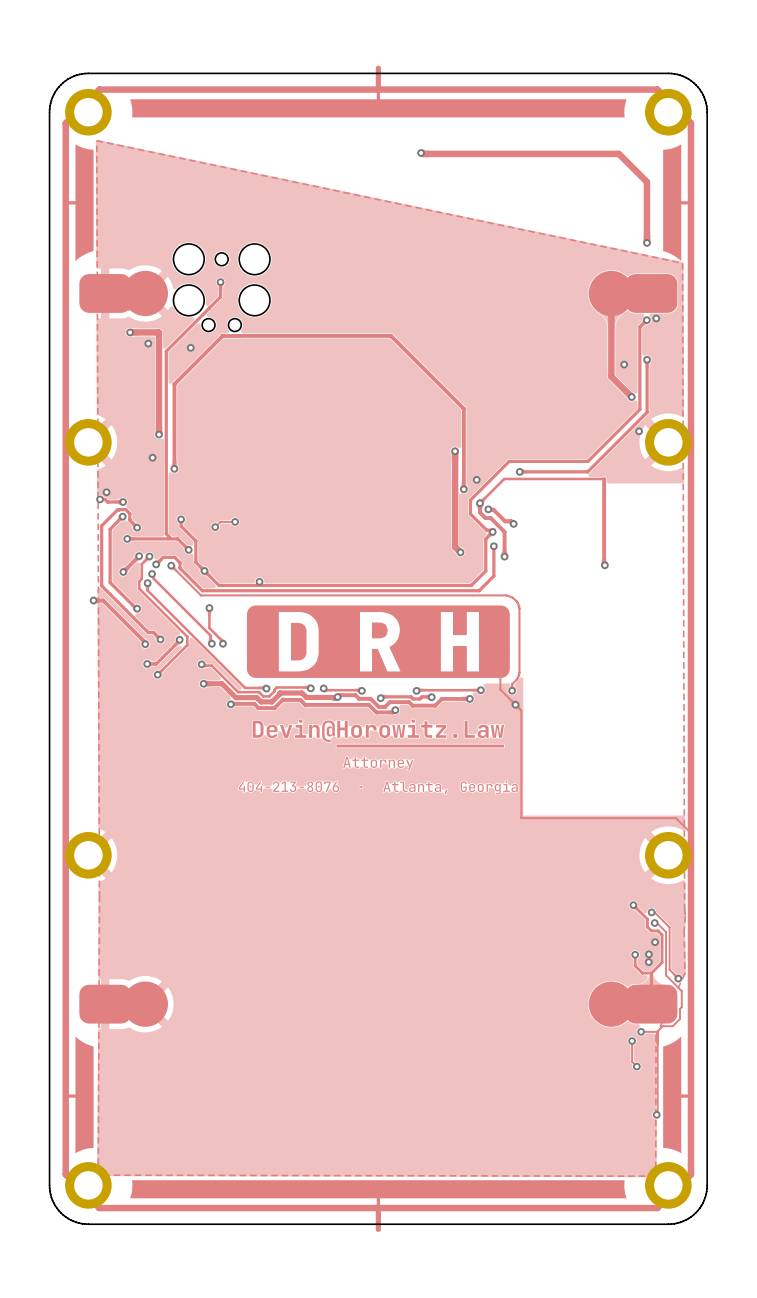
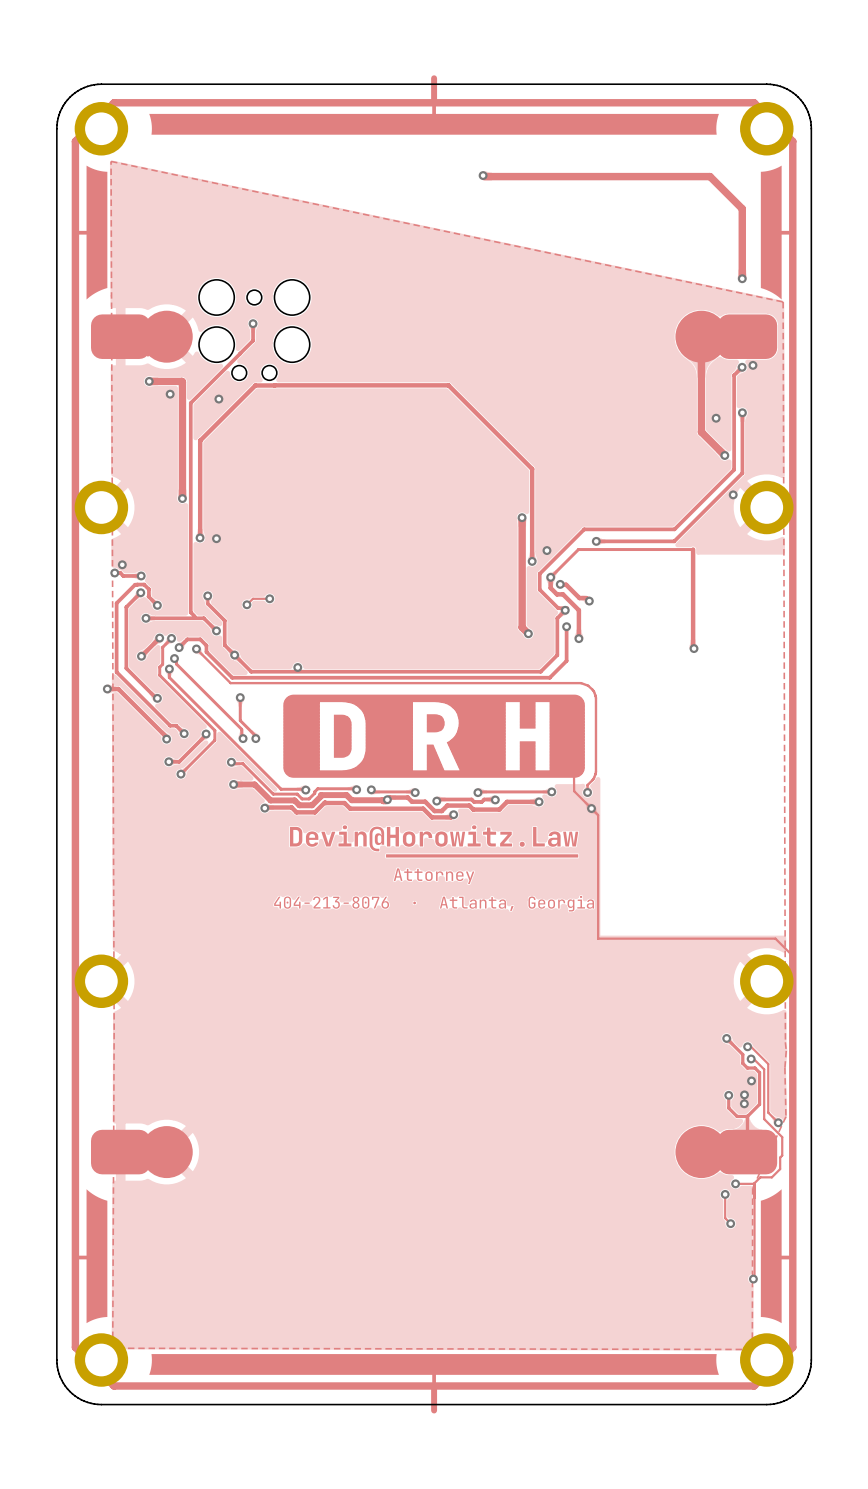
via position: (152, 457) -> (216, 538)

